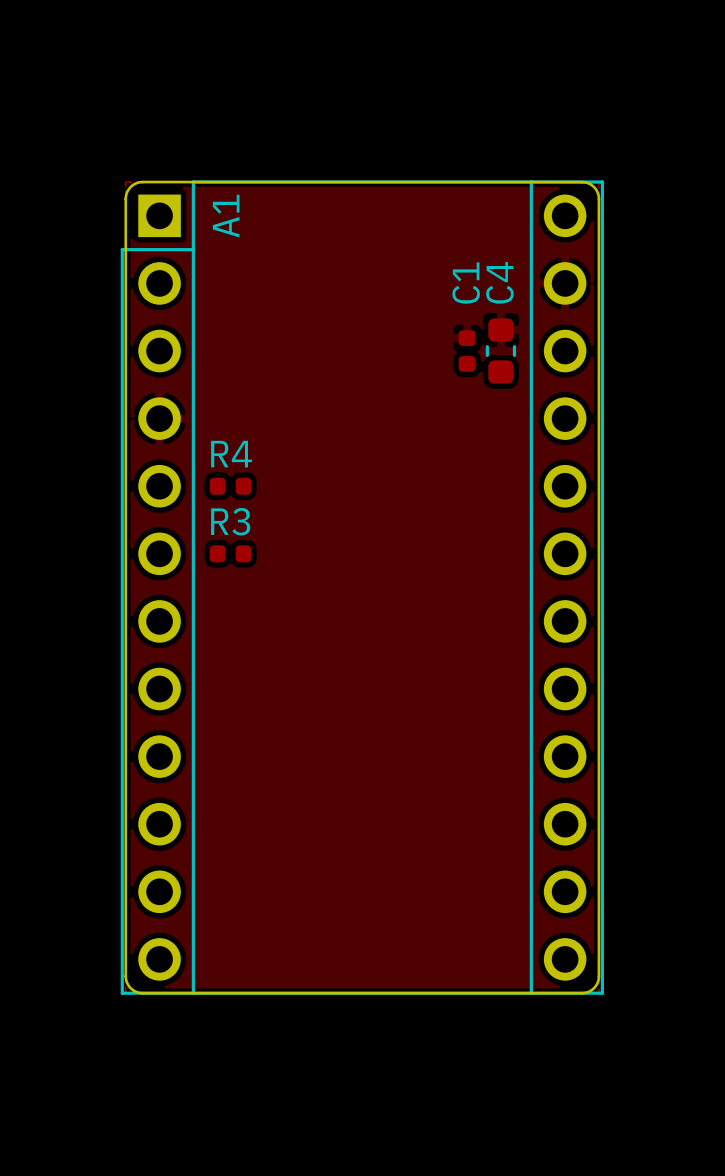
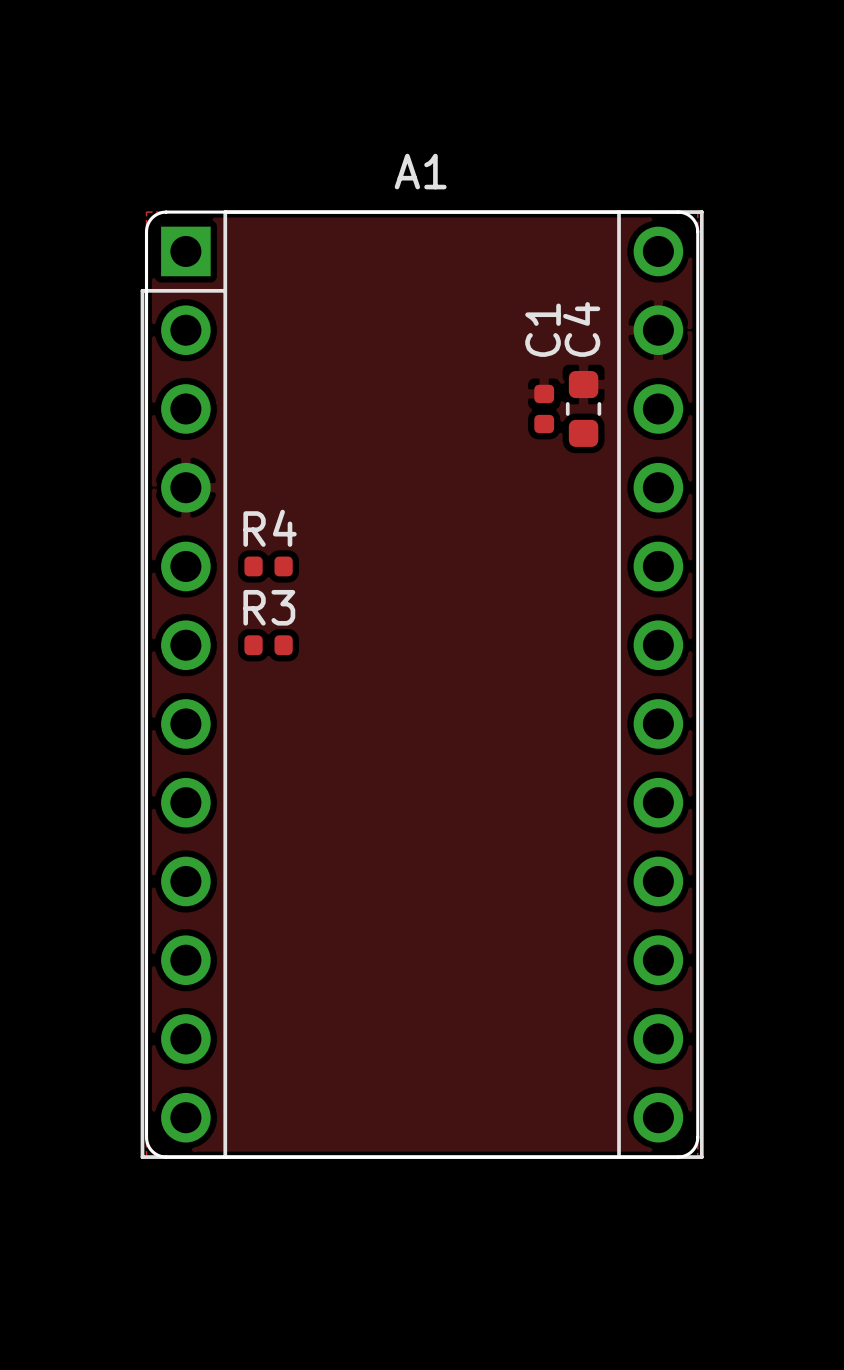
A1 name rotation: 0° (226, 216) -> 90° clockwise (420, 171)
A1 name position: A1 (226, 216) -> A1 (420, 171)

